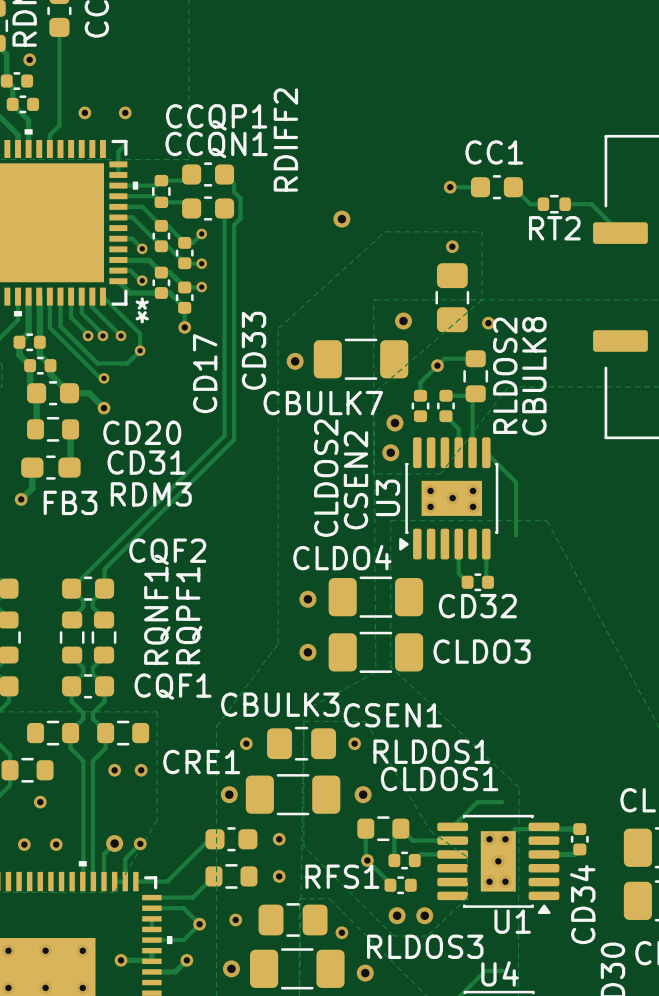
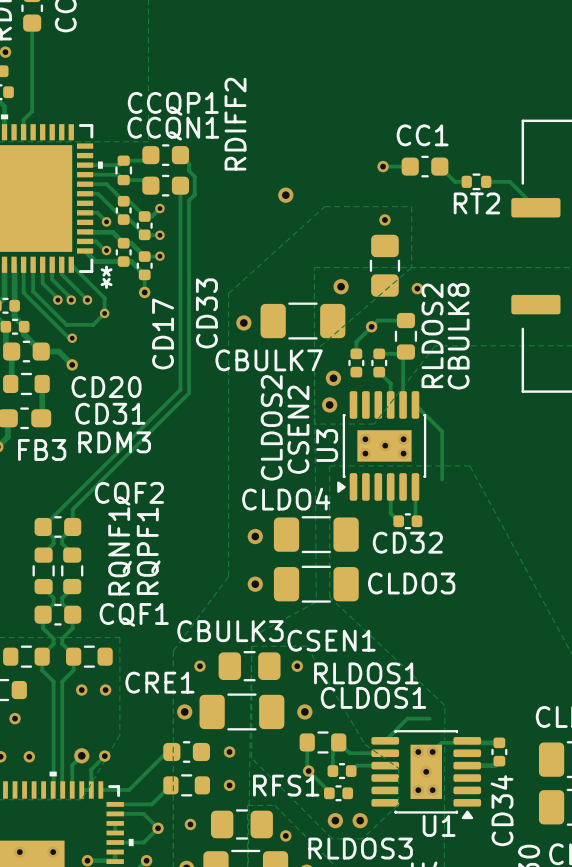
via: (84, 112) -> none
via: (125, 112) -> none
track: (125, 144) (118, 151) (118, 175) -> none

